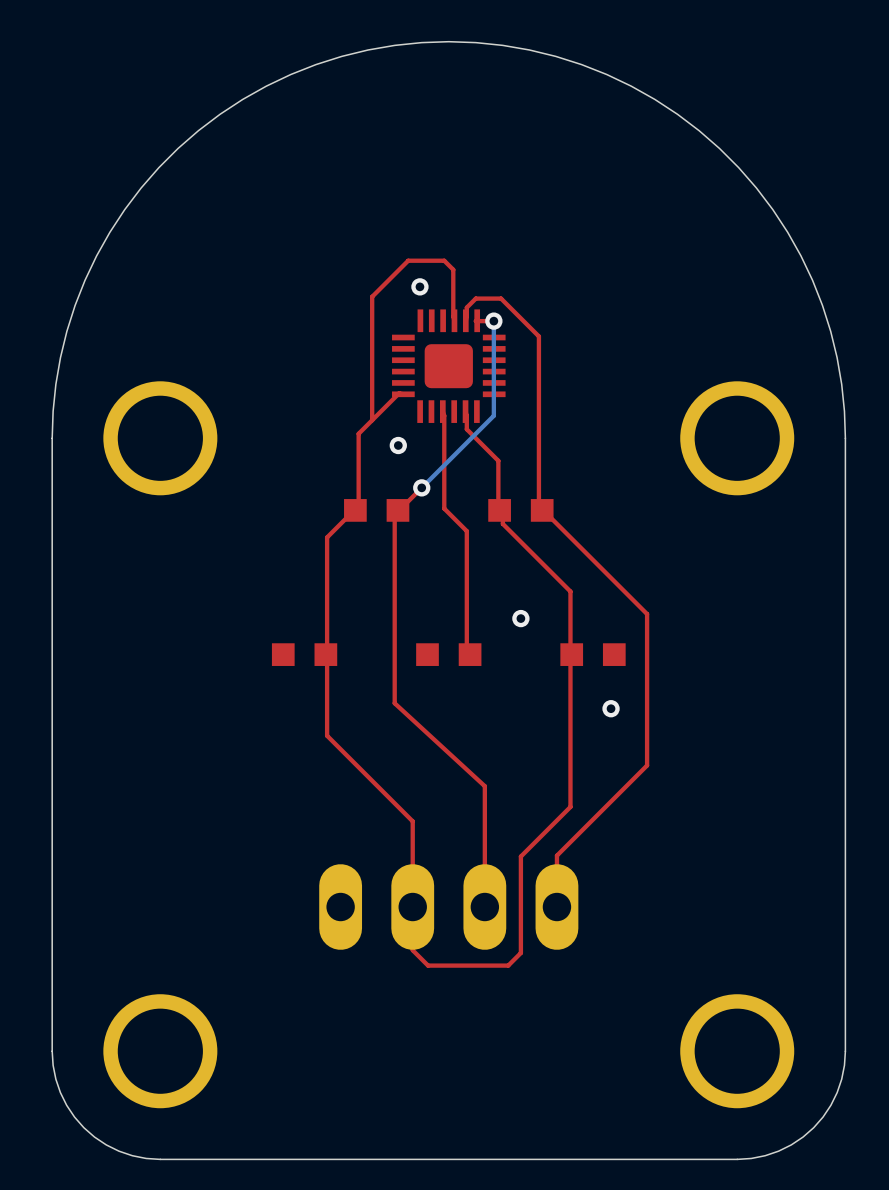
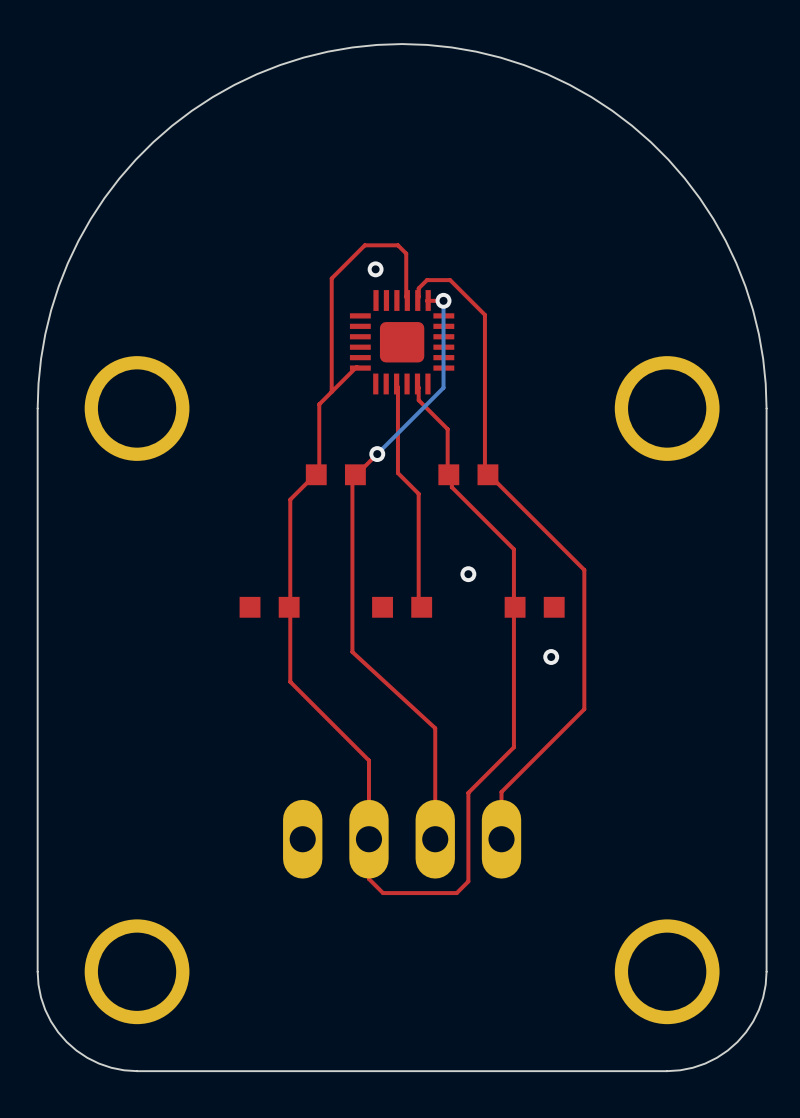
via: (398, 445) -> none

